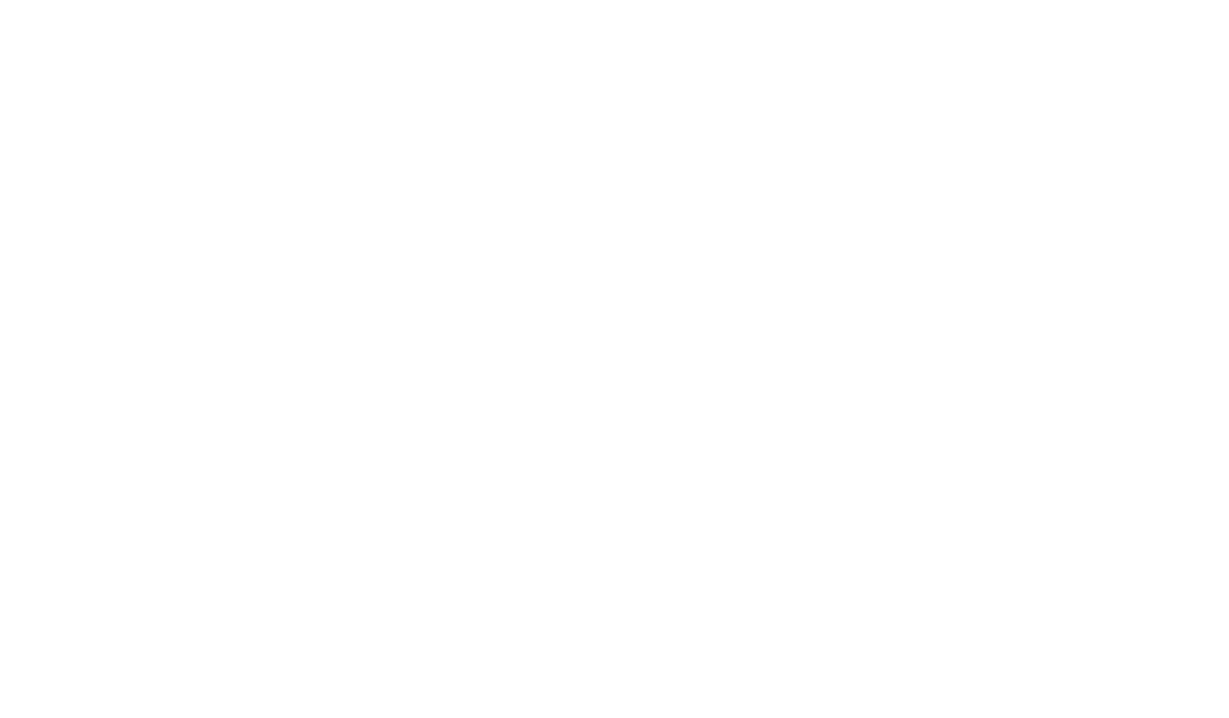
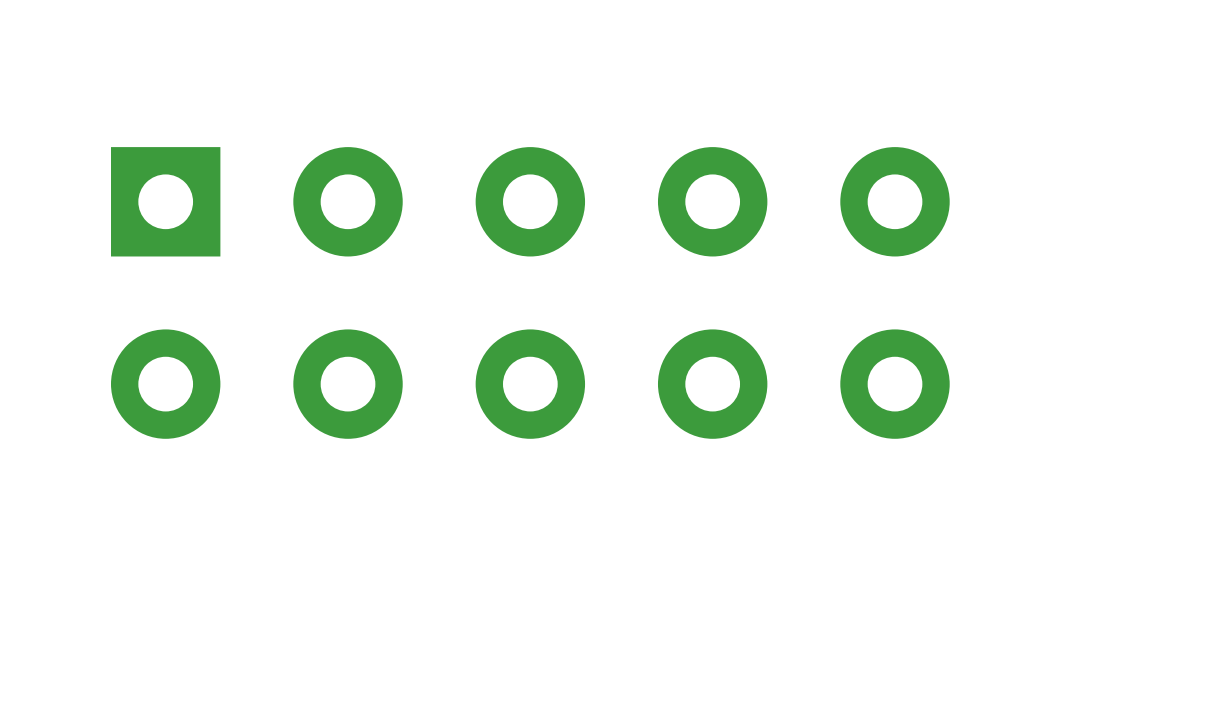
part: none -> (530, 292)

